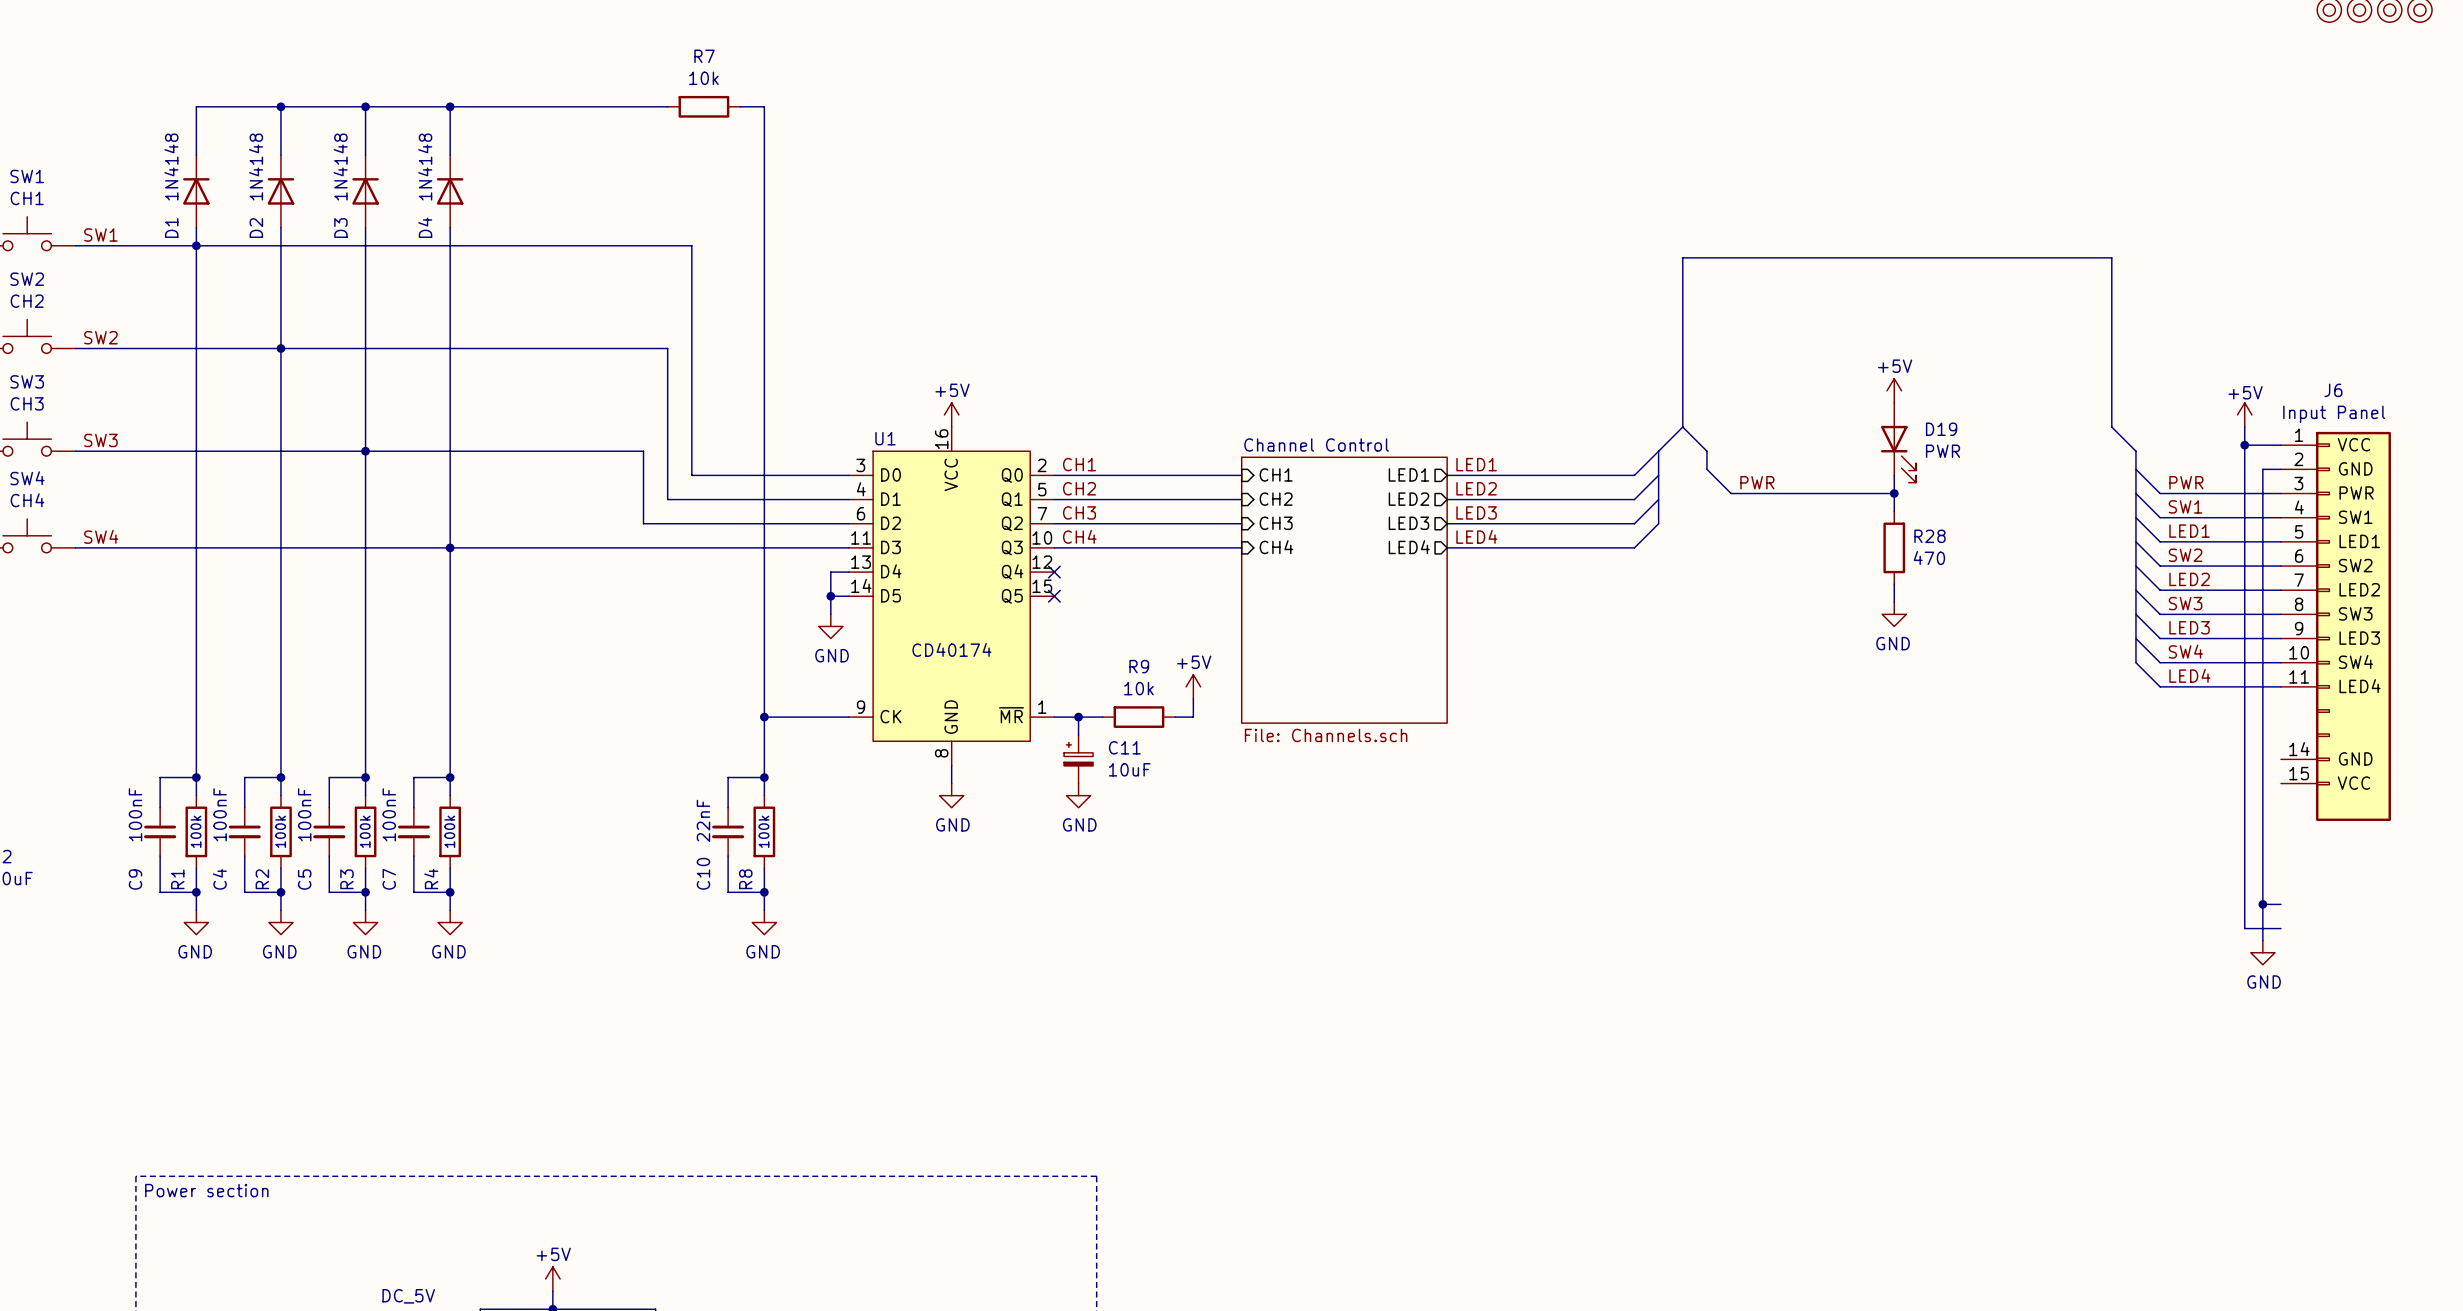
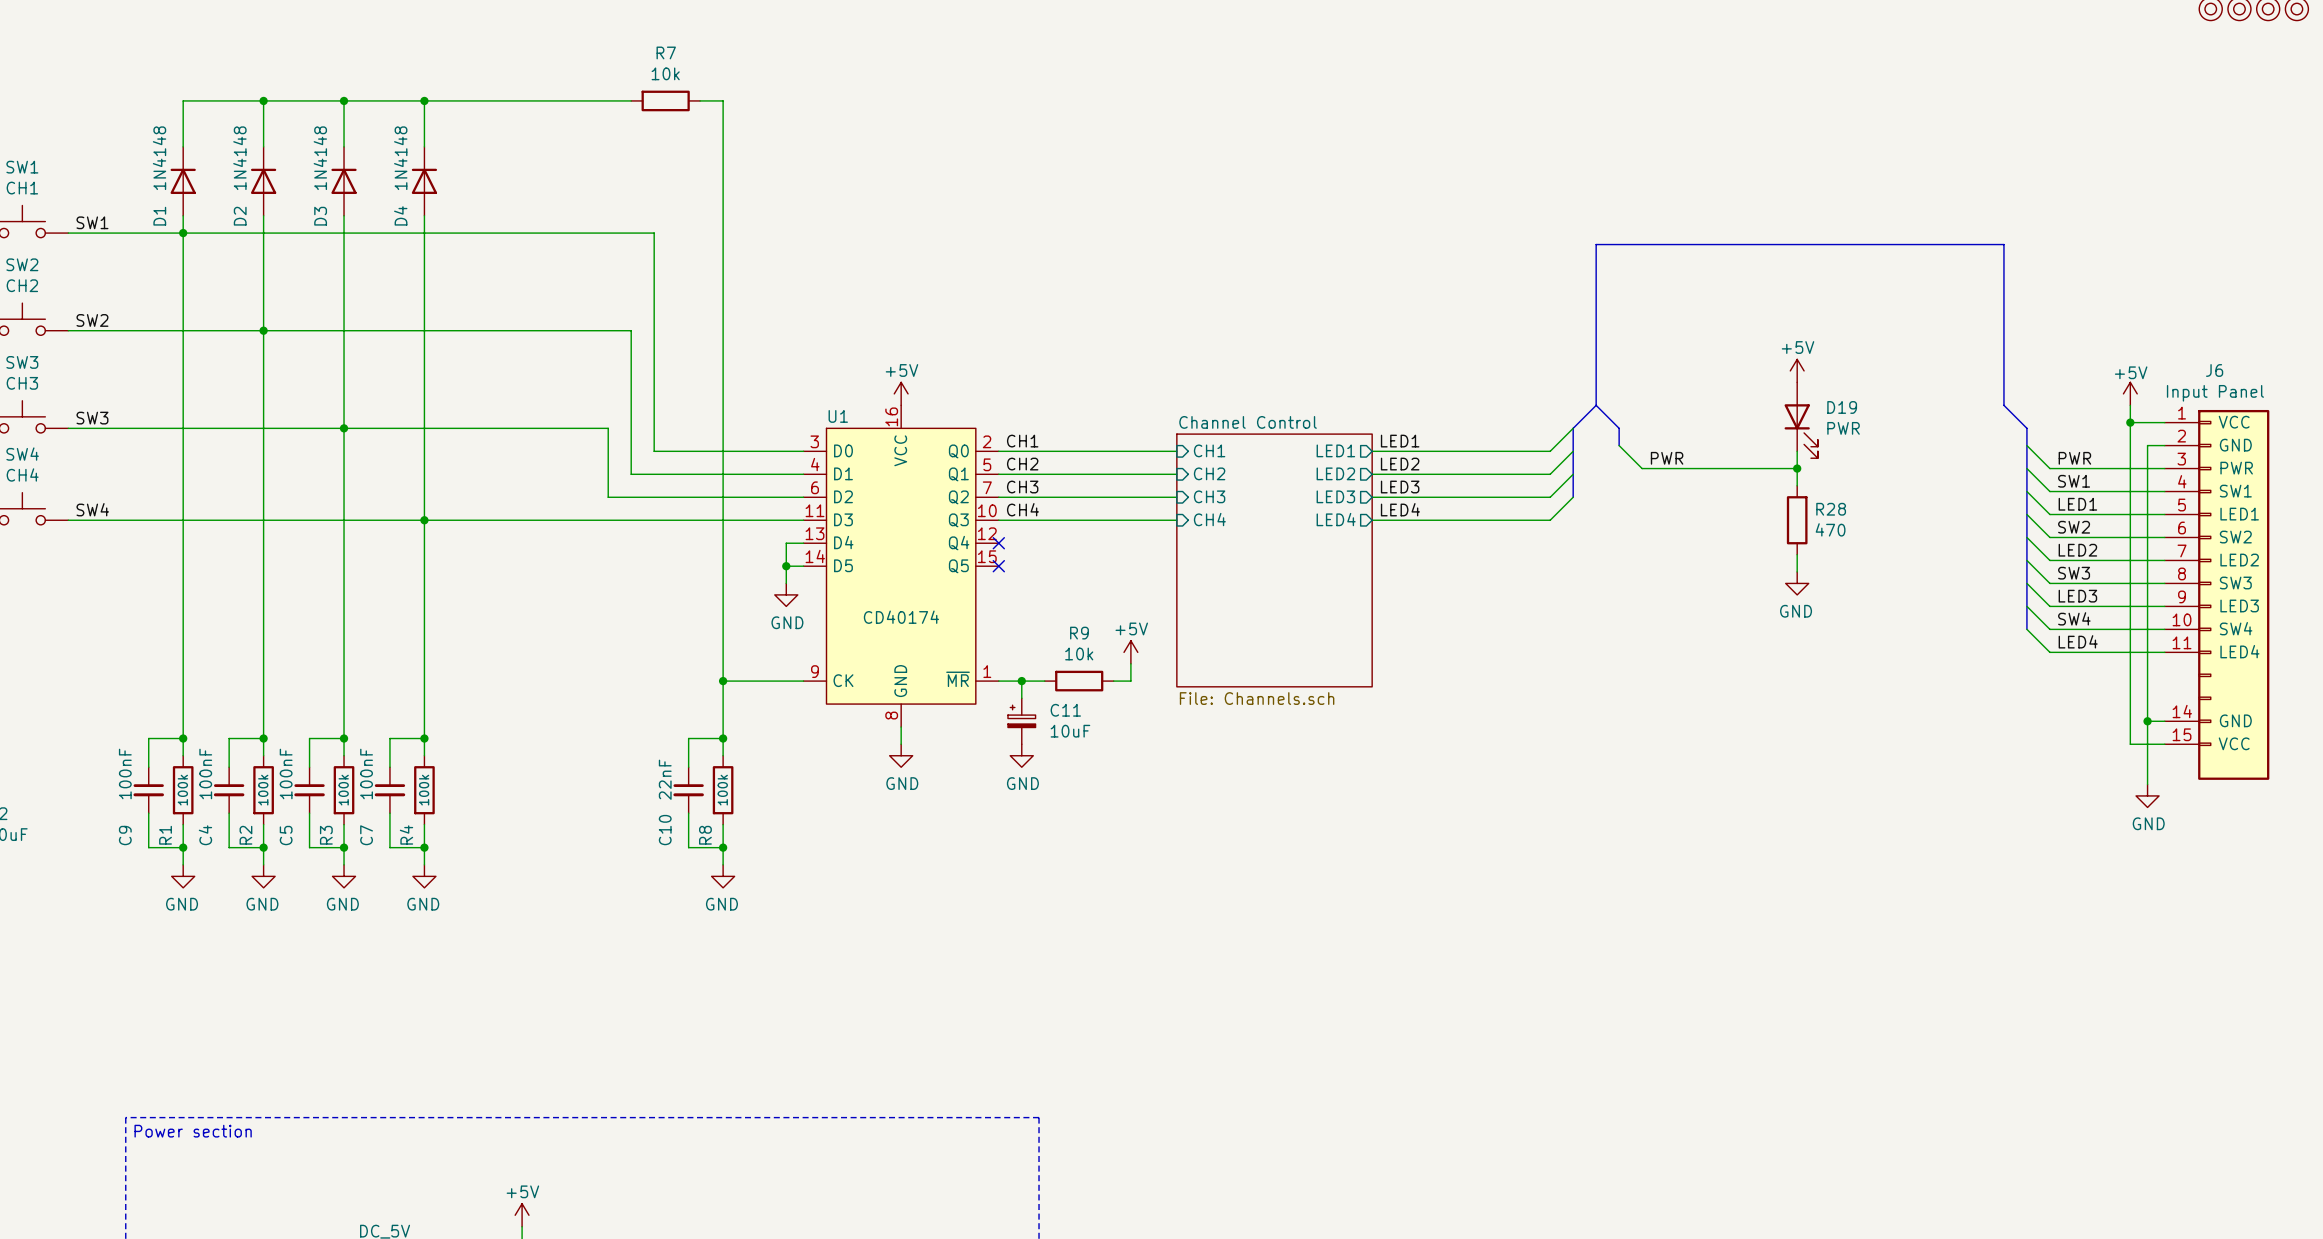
junction: none -> (2147, 721)
wire: (2244, 783) (2244, 928) (2280, 928) -> (2130, 744) (2164, 744)
wire: (2262, 825) (2262, 940) -> none
wire: (2262, 904) (2280, 904) -> (2147, 721) (2164, 721)
junction: (2262, 904) -> none
power symbol position: GND (2262, 952) -> GND (2147, 795)

